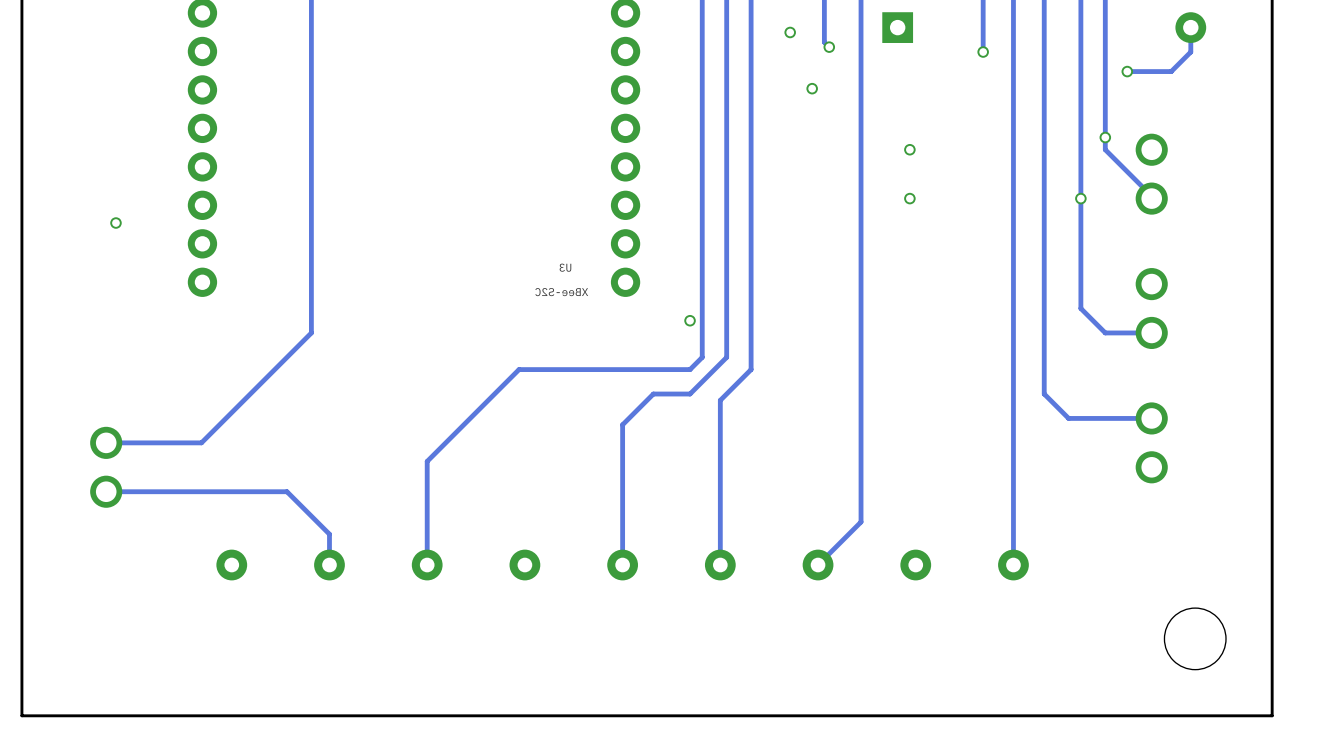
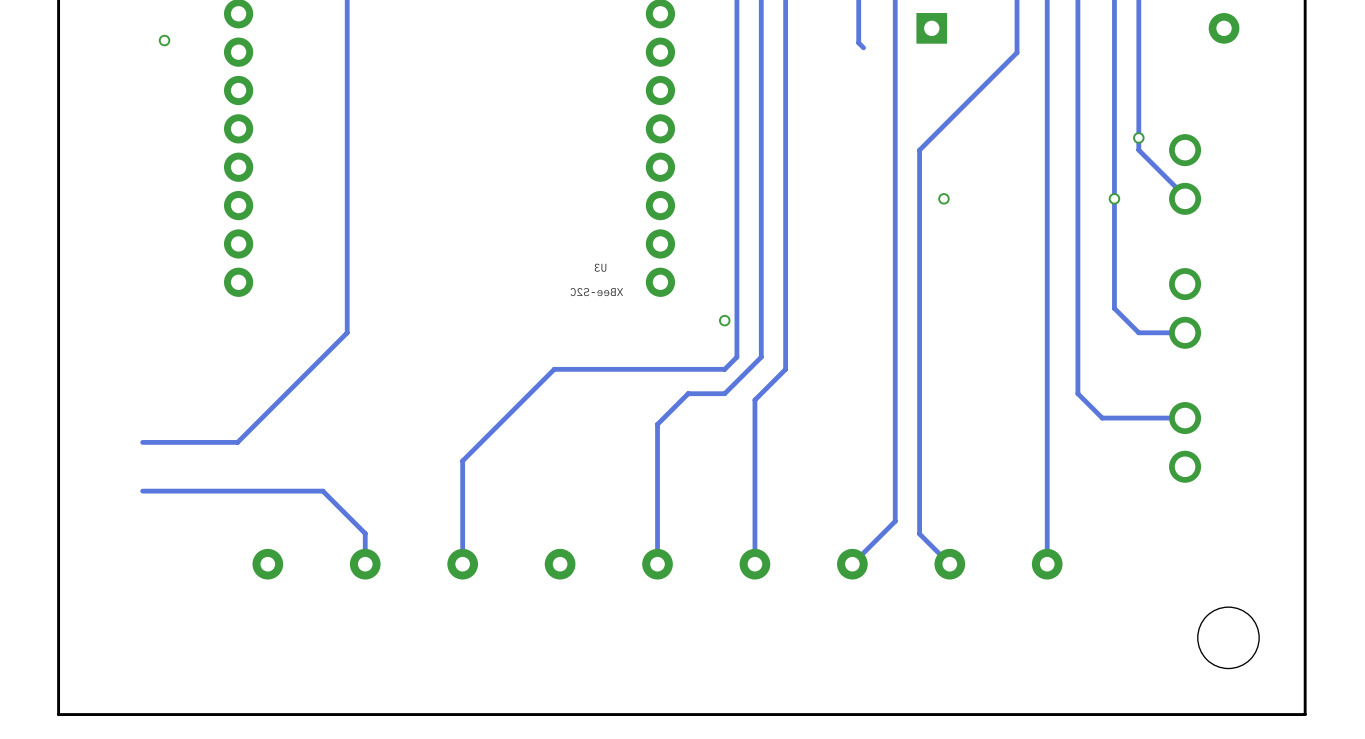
track: (1190, 27) (1190, 52) (1171, 71) (1127, 71) -> none
via: (790, 32) -> none
via: none -> (164, 40)
via: (829, 47) -> none
track: none -> (1017, 52) (919, 150) (919, 533) (949, 564)
via: (983, 52) -> none
via: (1127, 71) -> none
via: (812, 88) -> none
via: (909, 149) -> none
via: (115, 223) -> none
part: (106, 467) -> none

